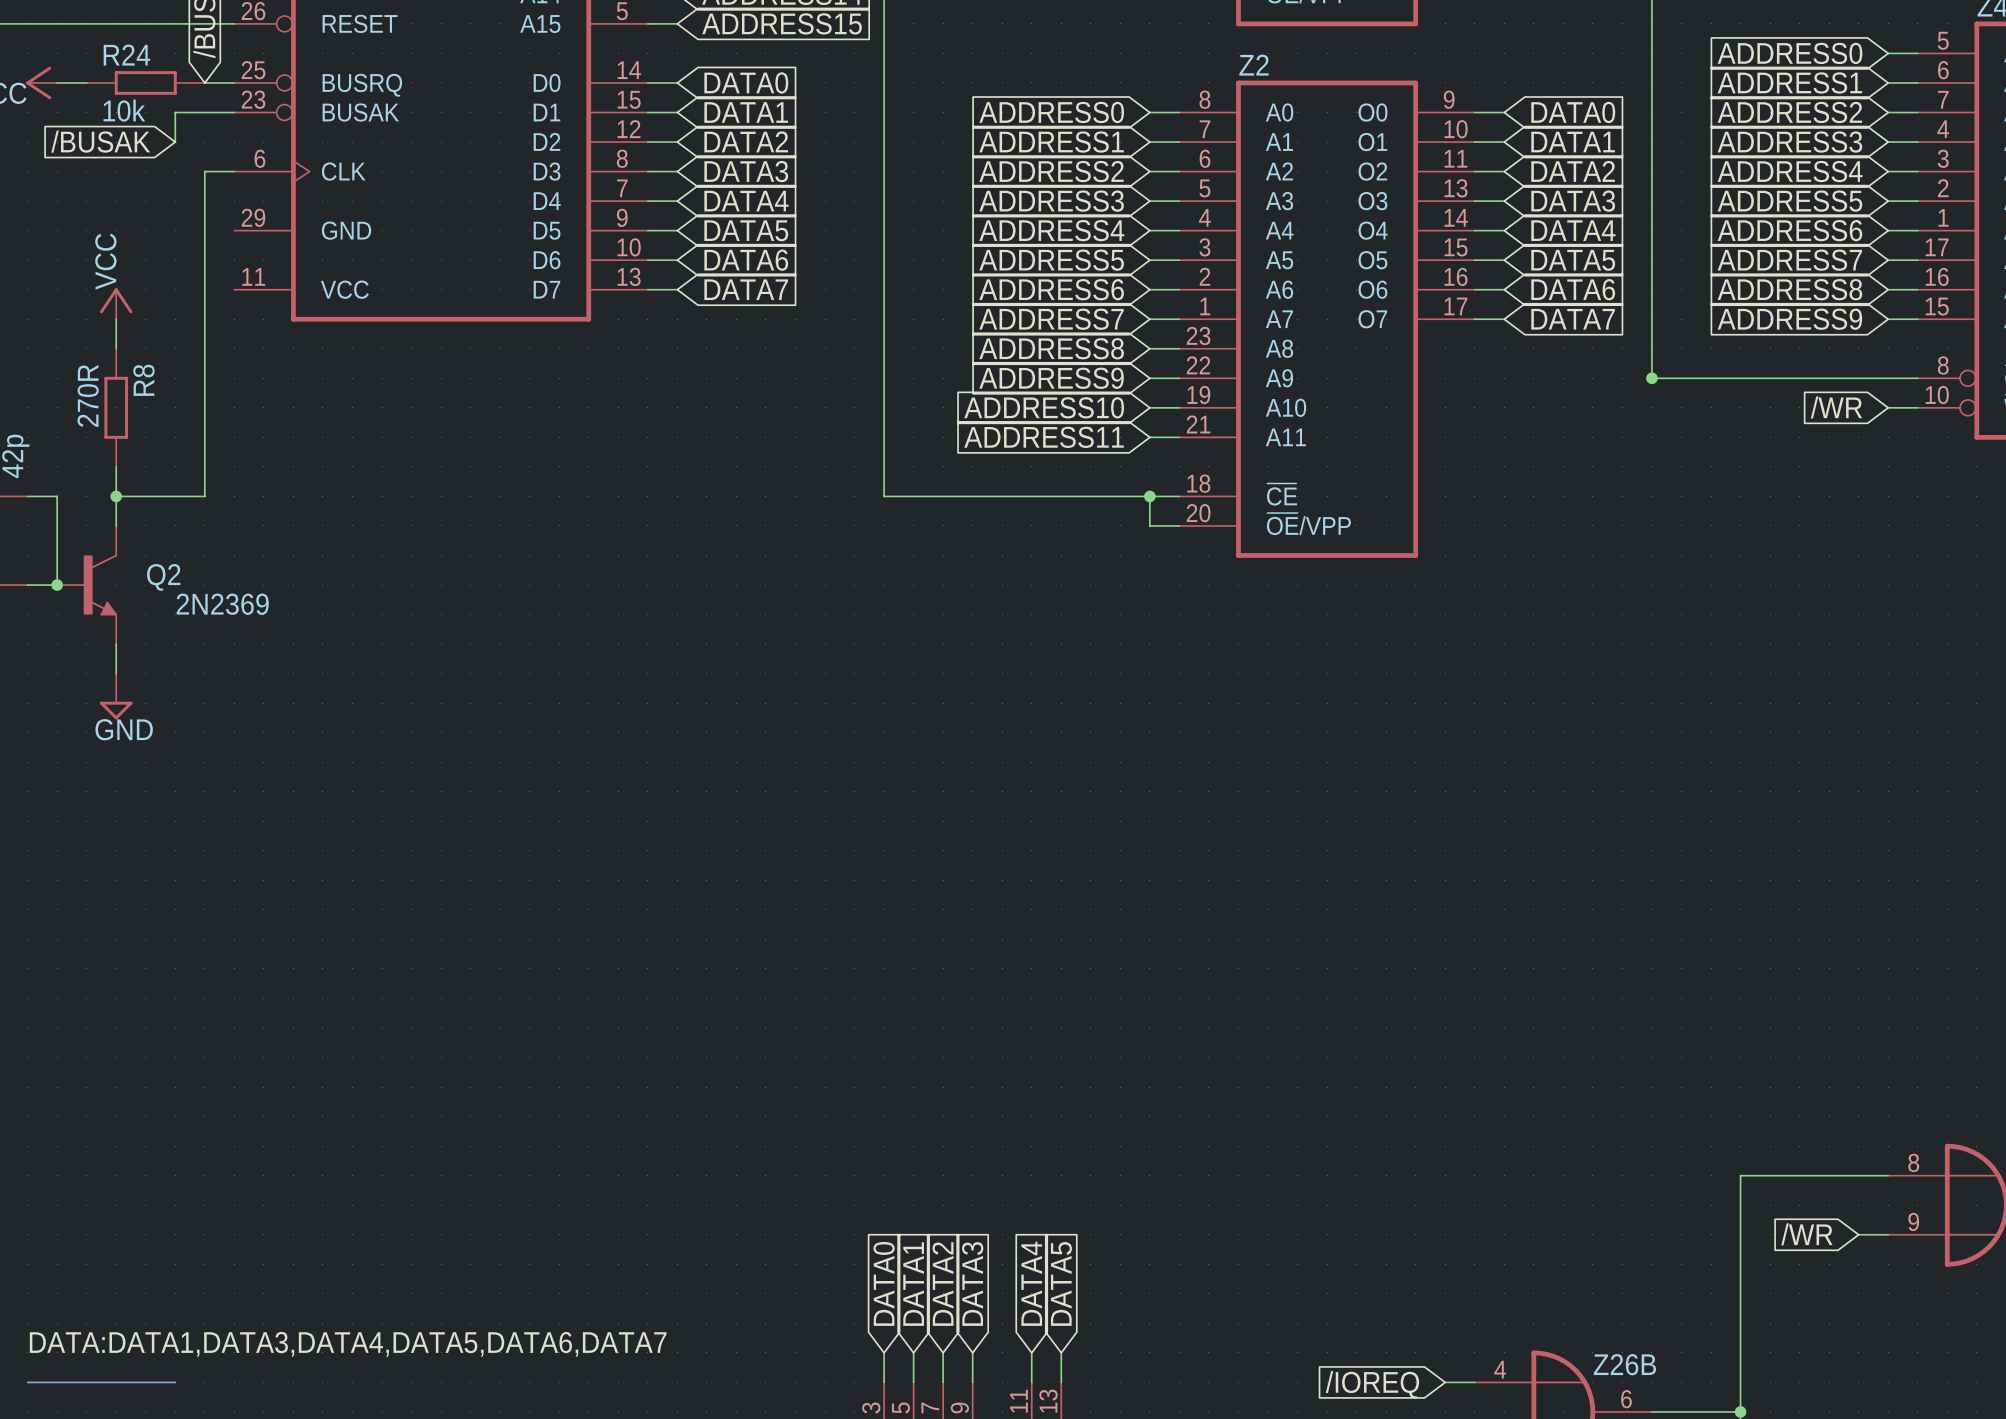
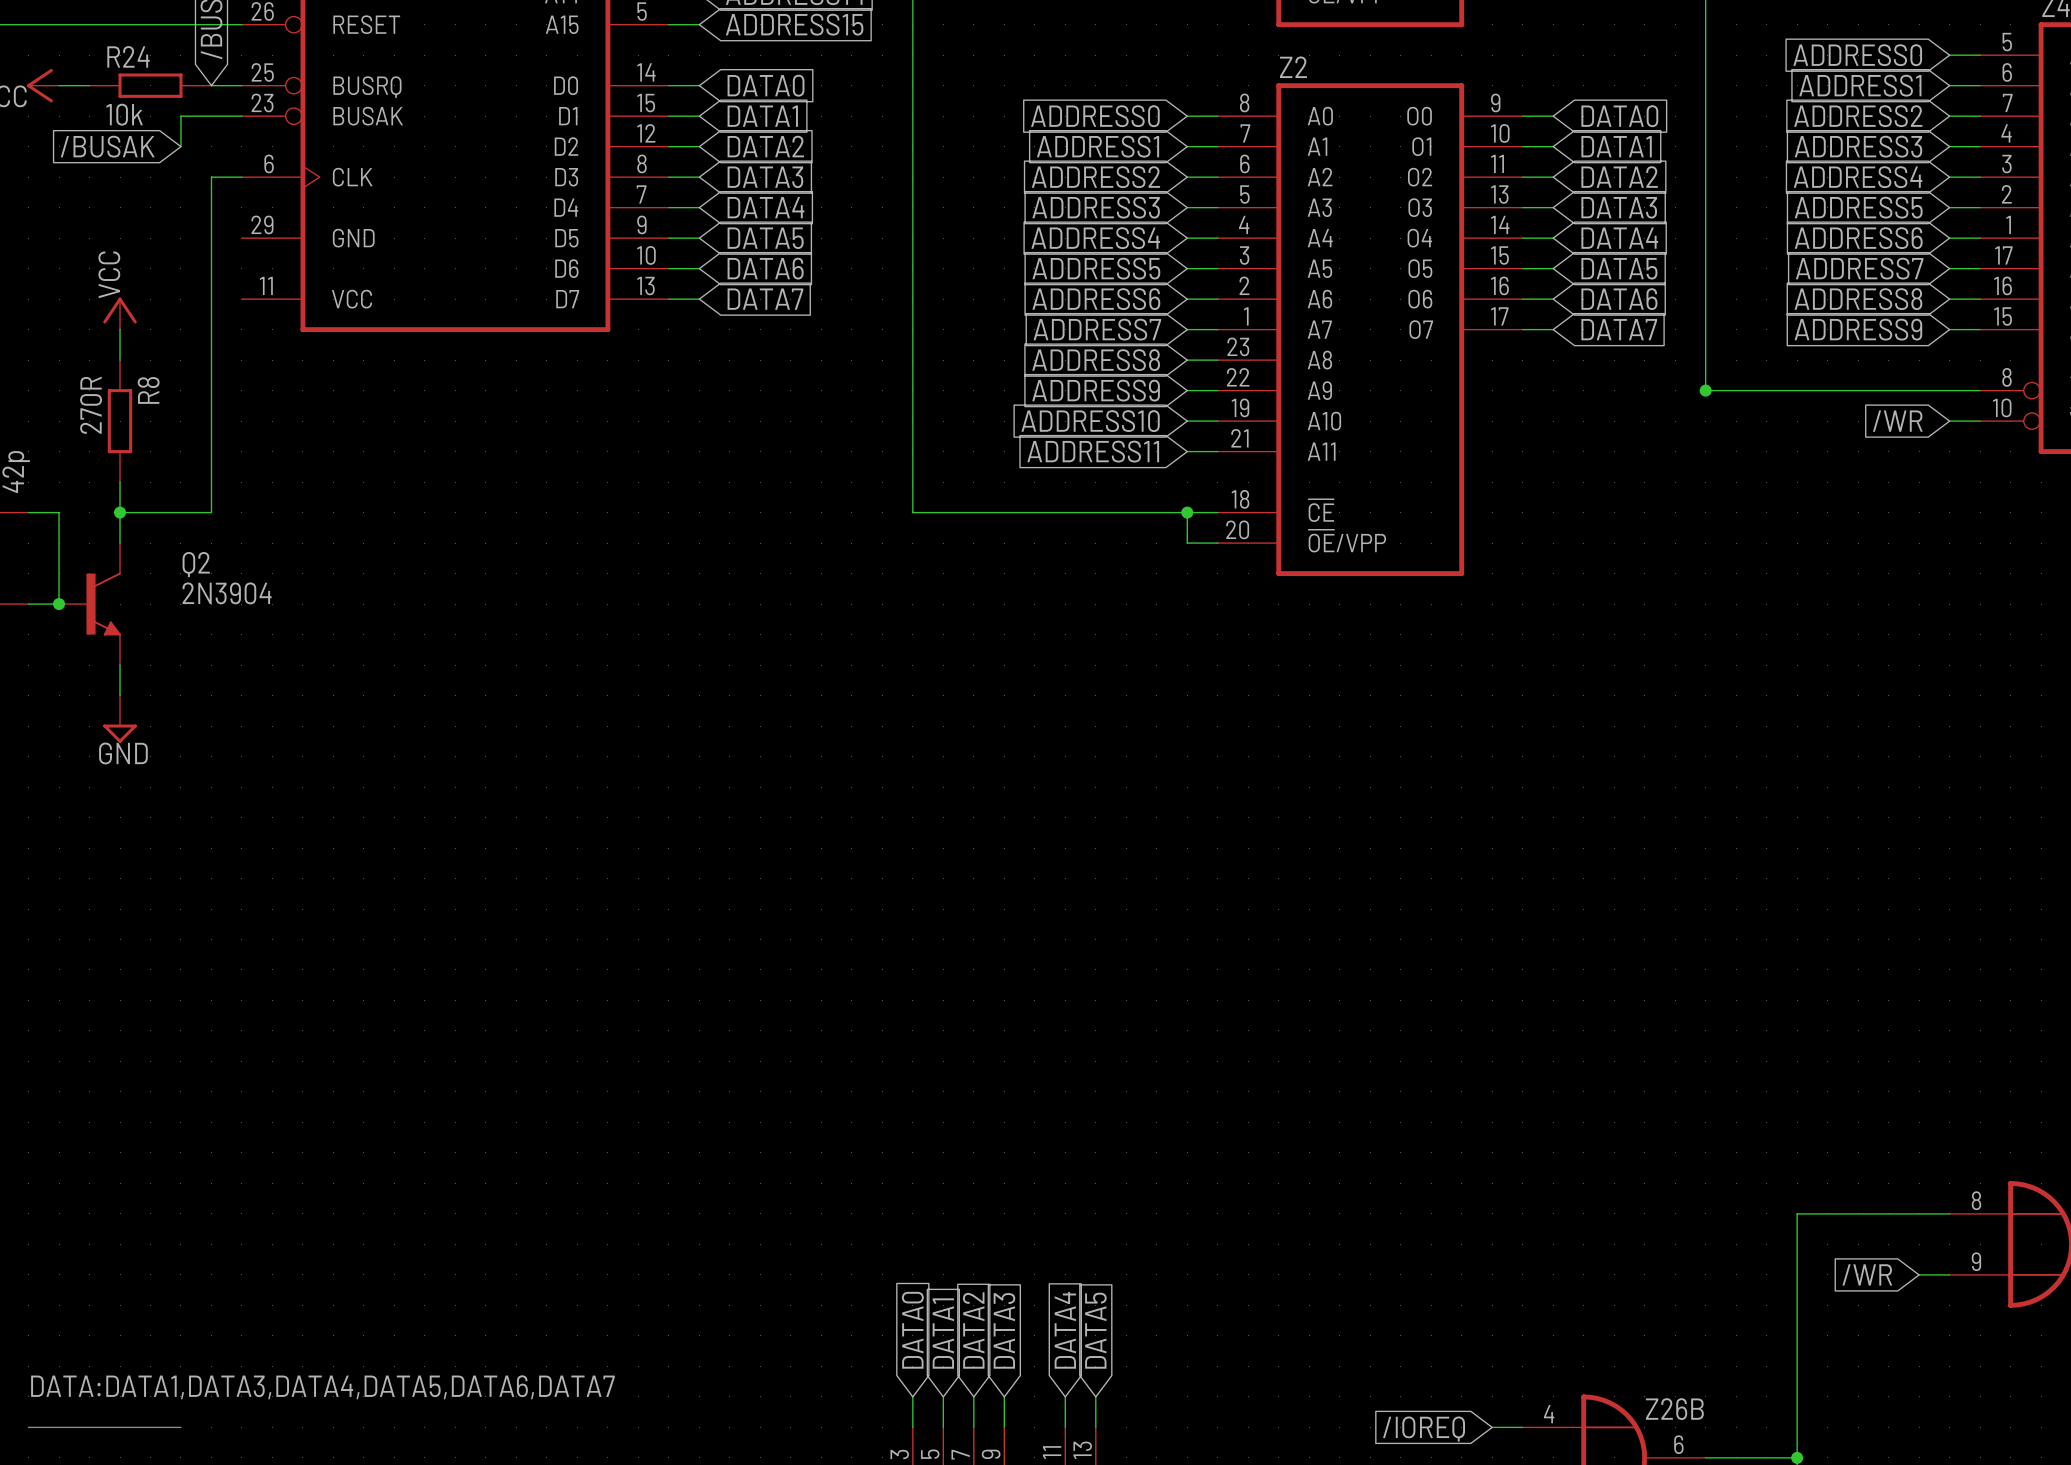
Q2 name position: Q2 (163, 577) -> Q2 (196, 564)
Q2 value: 2N2369 (222, 604) -> 2N3904 (227, 593)

